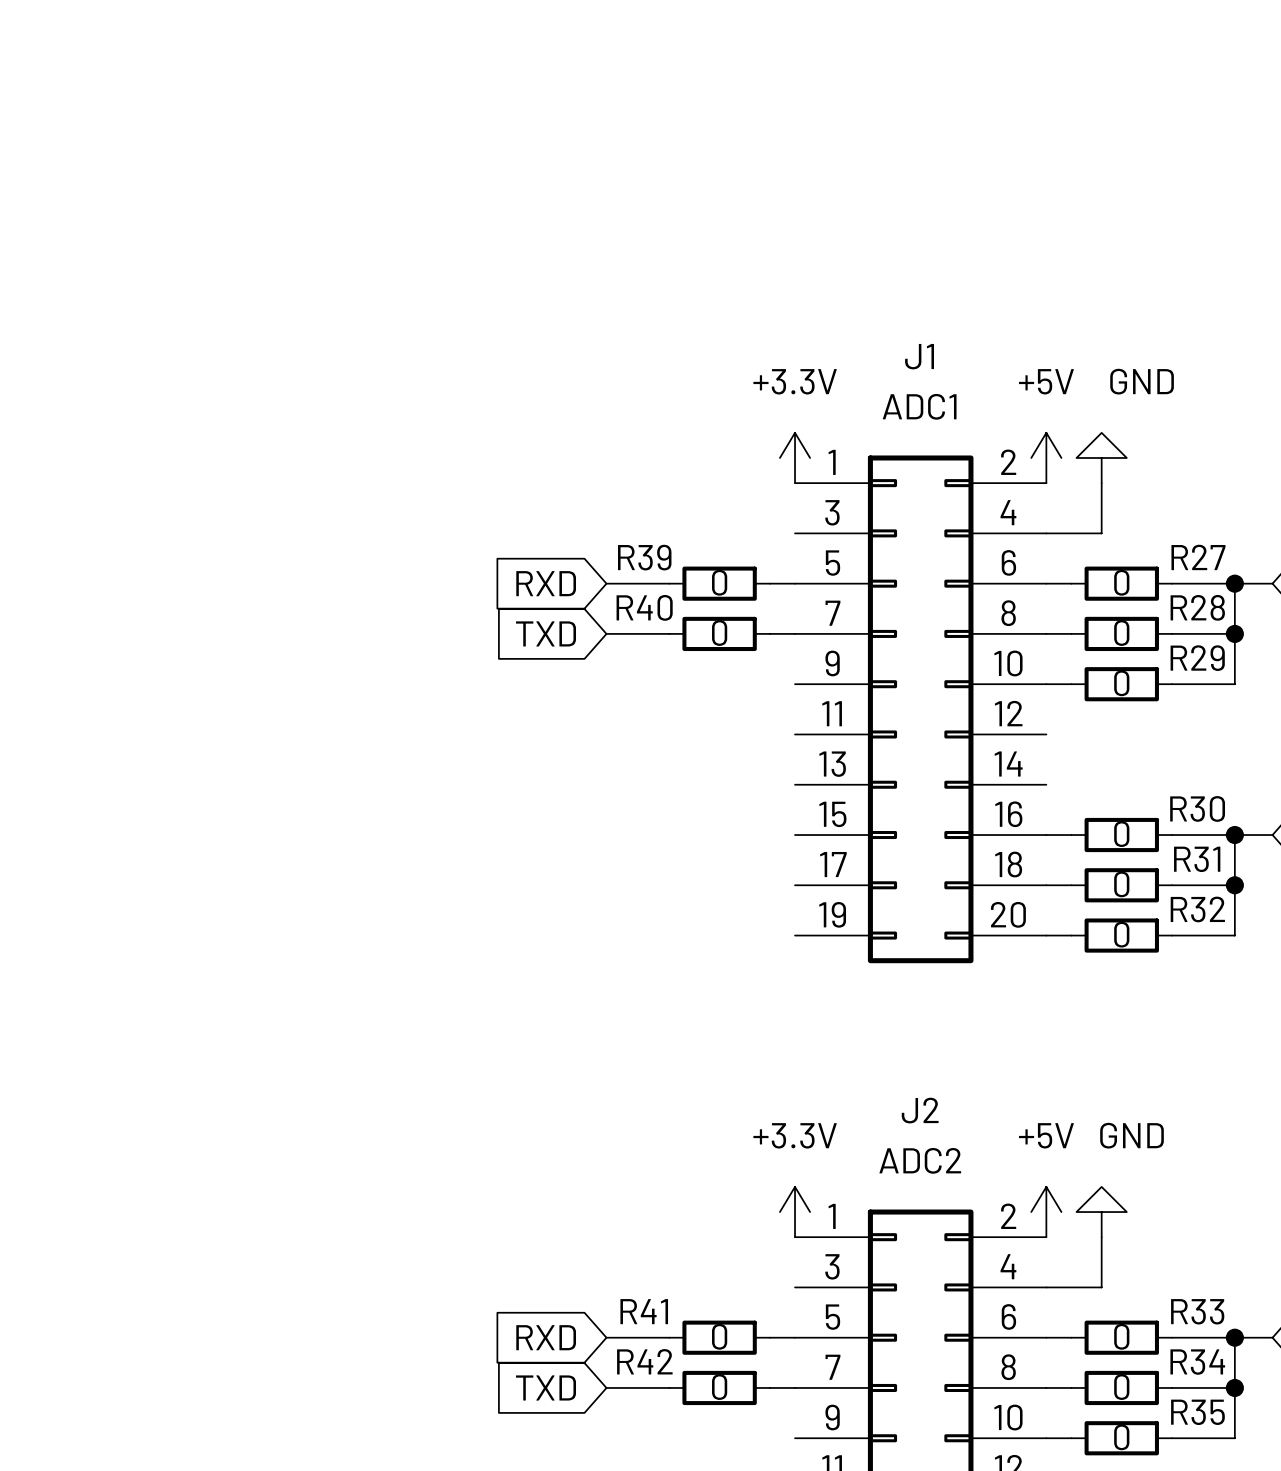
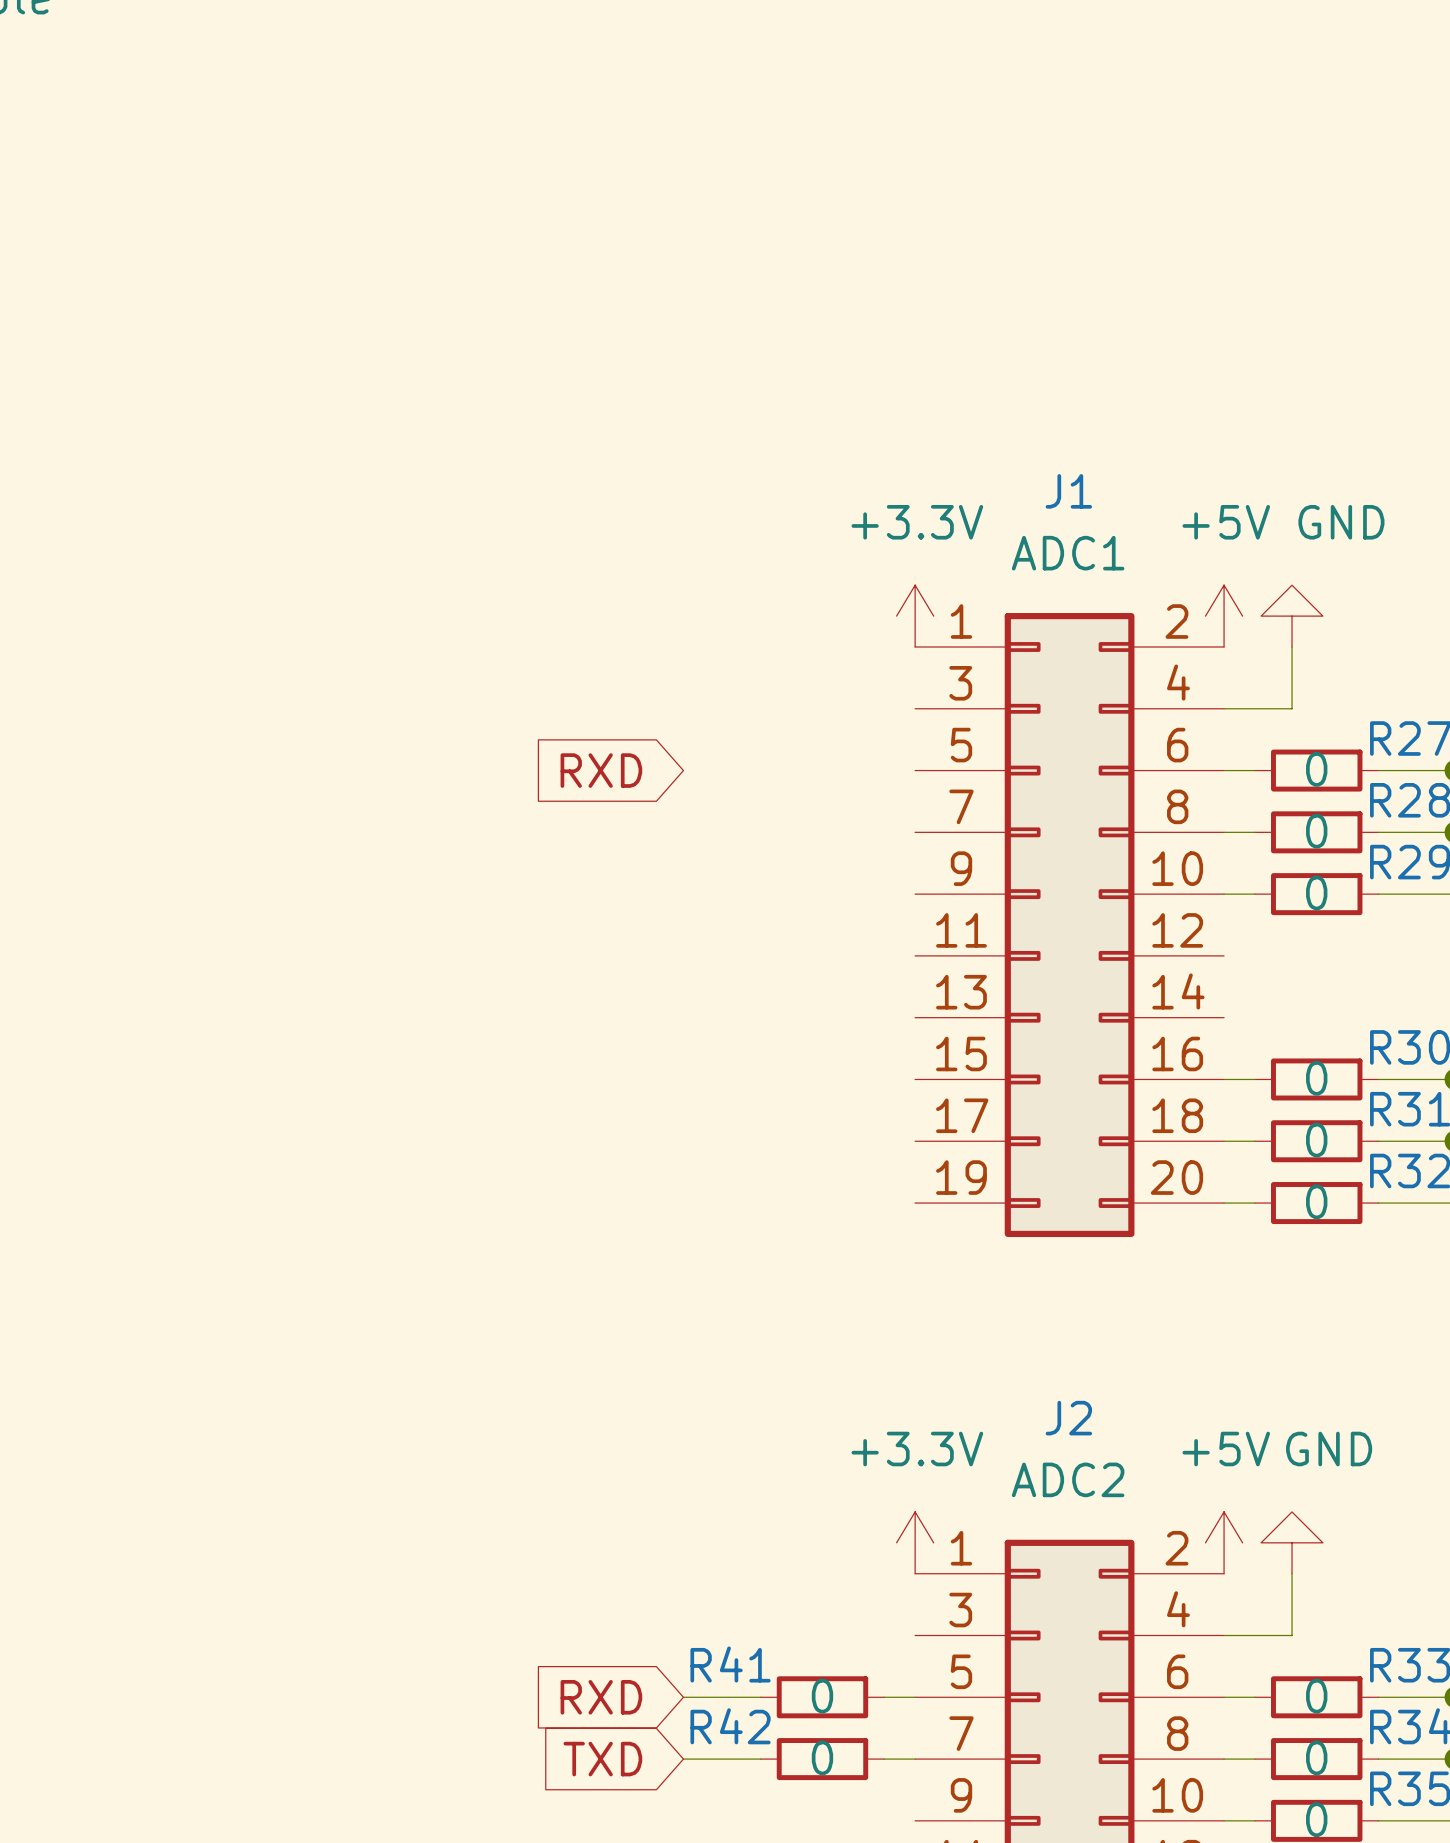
wire: (606, 583) (669, 583) -> none
R39: 0 (719, 583) -> none
wire: (769, 583) (795, 583) -> none
global label: TXD (546, 633) -> none
wire: (606, 633) (669, 633) -> none
R40: 0 (719, 633) -> none
wire: (769, 633) (795, 633) -> none

